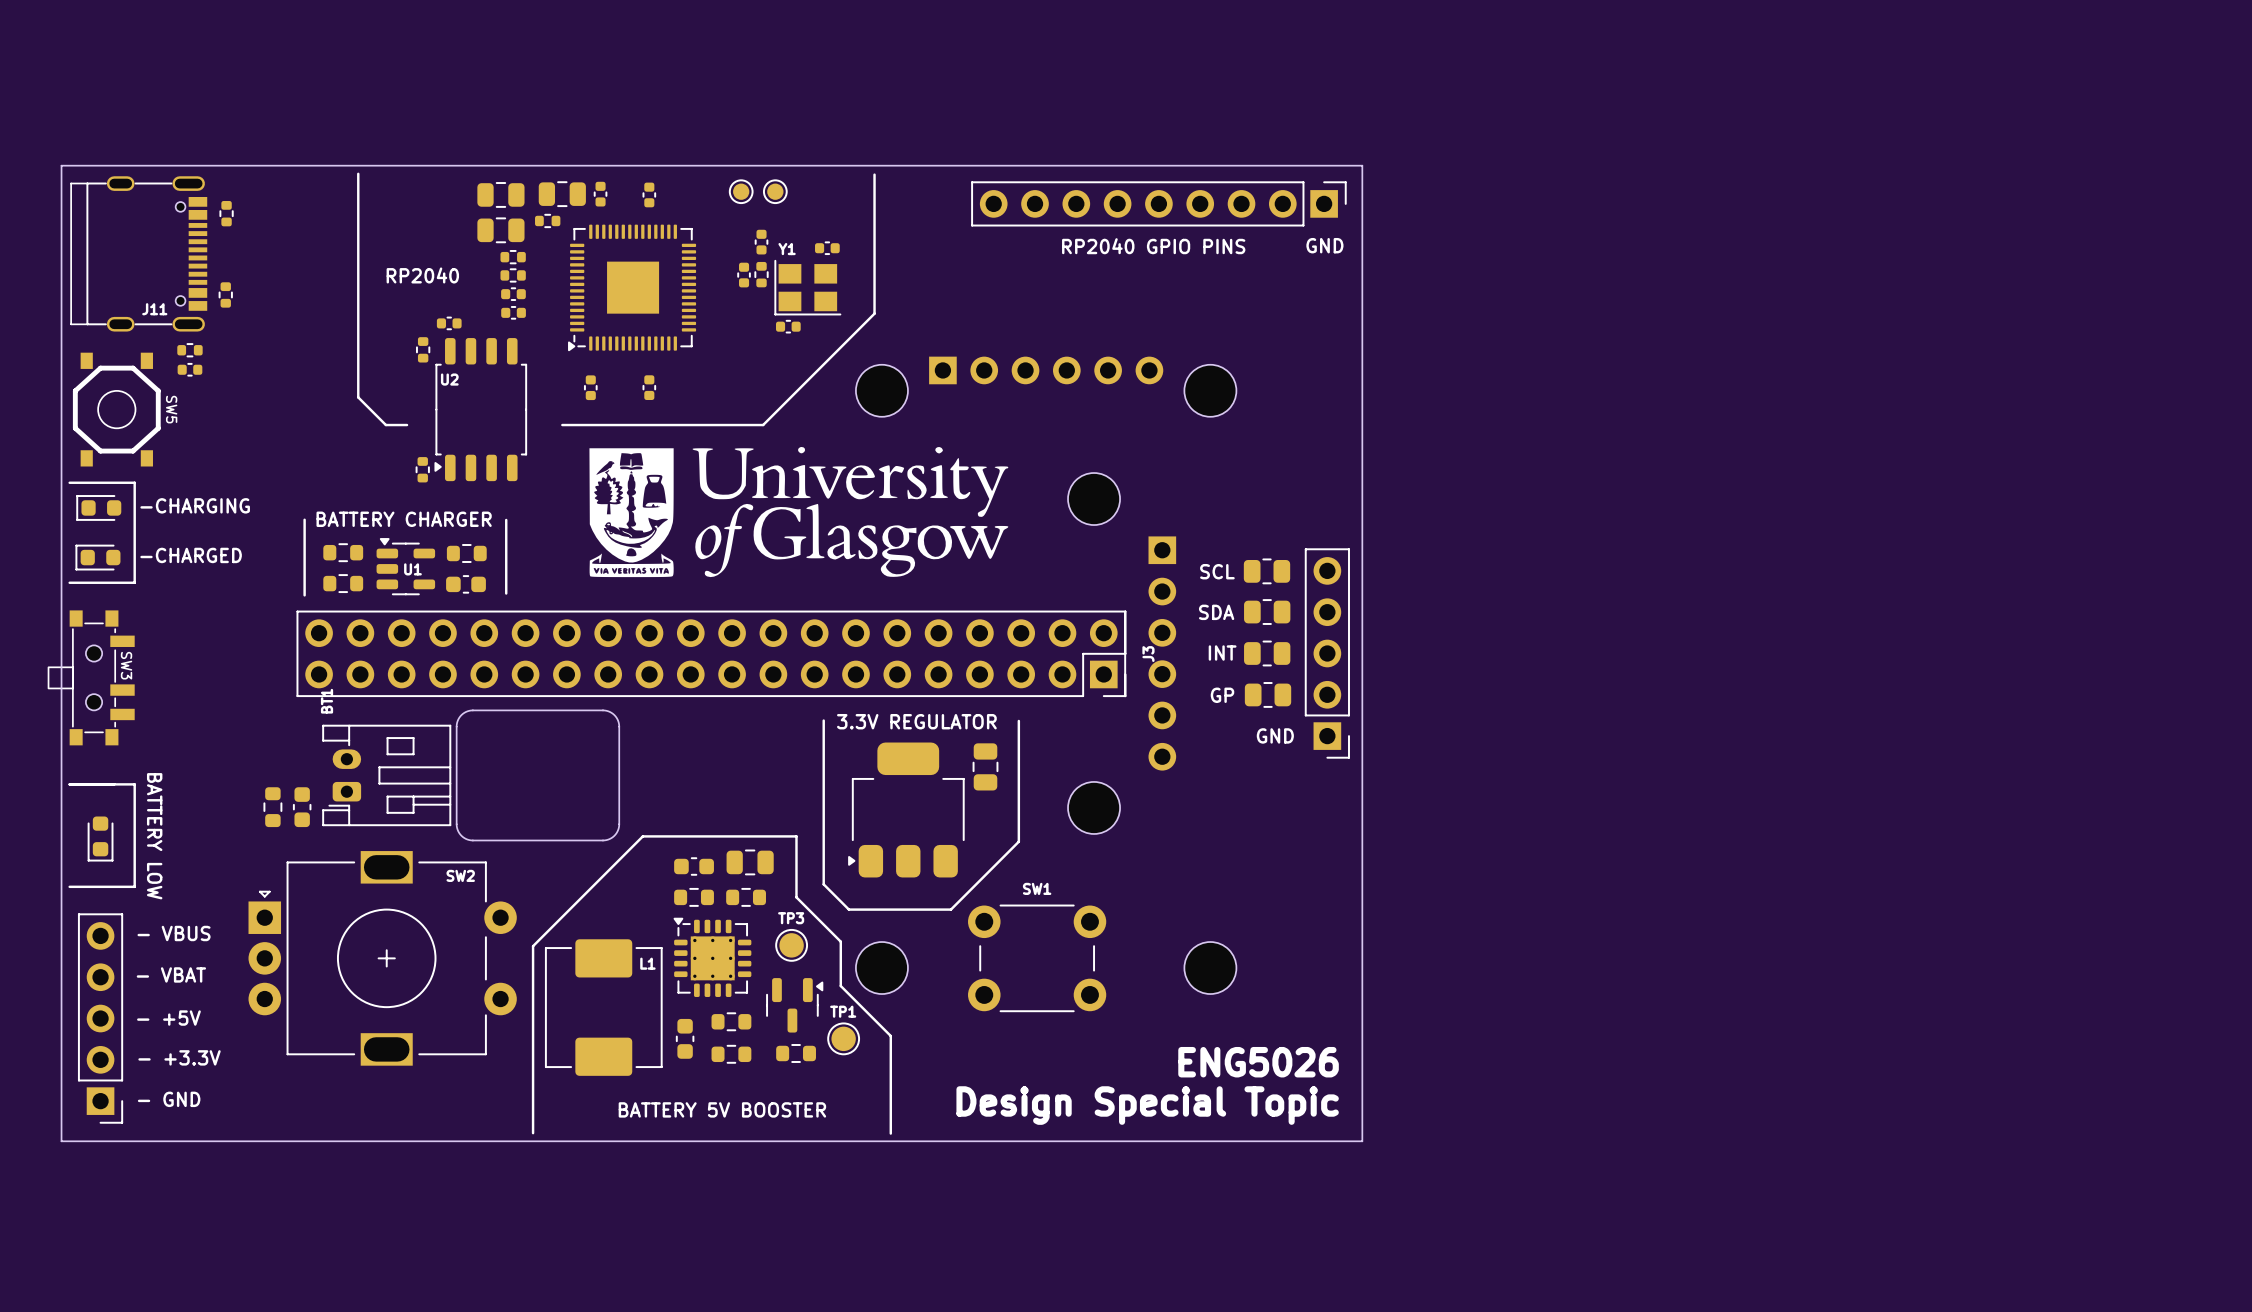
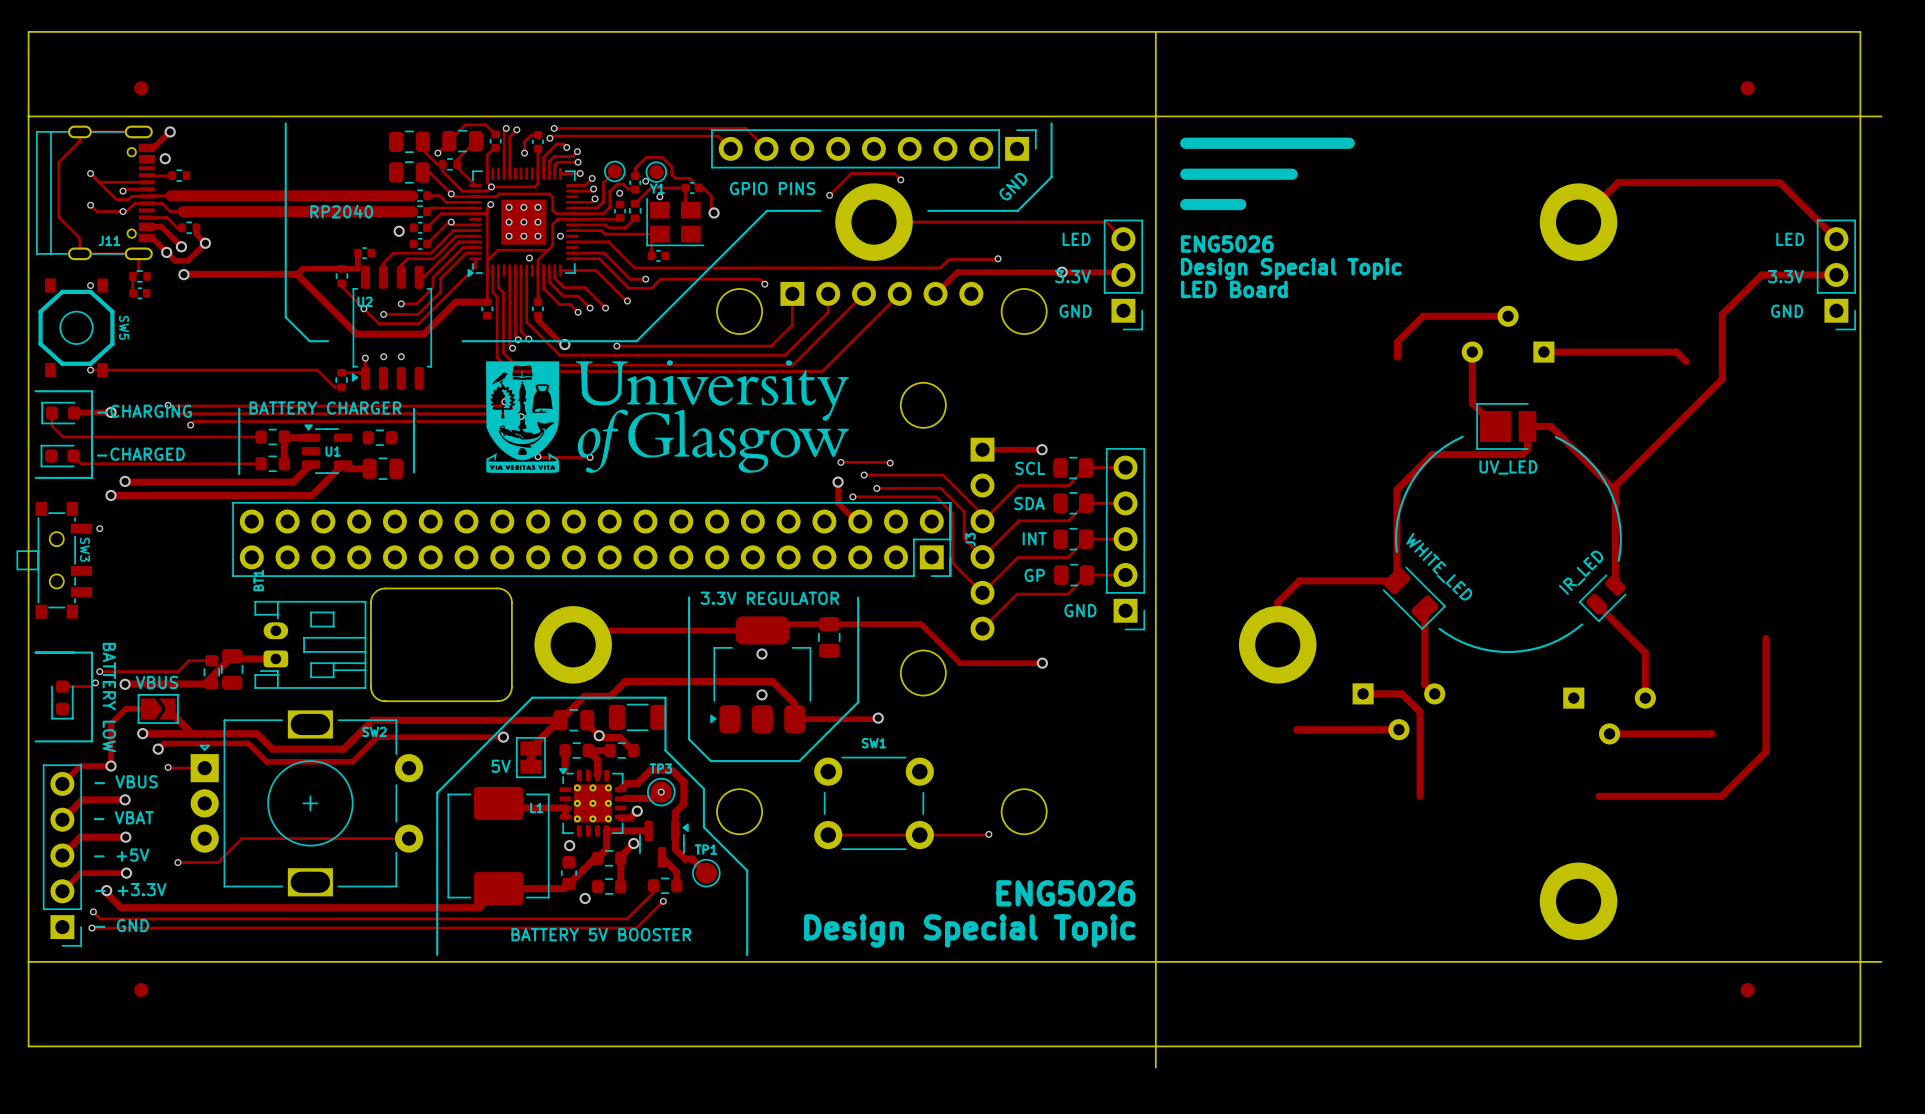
board edge: none -> (1155, 31) (1155, 116) (1881, 116)
part: none -> (141, 88)
part: none -> (1747, 88)
board edge: none -> (28, 116) (28, 31) (1860, 31) (1860, 1046) (28, 1046) (28, 961)
line: none -> (1051, 123) (1051, 177) (1017, 210) (928, 210)
line: (874, 174) (874, 313) -> (820, 210) (766, 210) (733, 244)
track: none -> (506, 128) (504, 130) (504, 173)
via: none -> (506, 128)
track: none -> (554, 128) (746, 128) (766, 148)
via: none -> (554, 128)
track: none -> (516, 129) (509, 136) (509, 173)
via: none -> (516, 129)
track: none -> (138, 131) (79, 131) (79, 141) (58, 162) (58, 217) (79, 238) (79, 253) (138, 253) (138, 270) (132, 276) (133, 293)
track: none -> (170, 131) (153, 147) (146, 147)
via: none -> (170, 131)
track: none -> (494, 134) (485, 124) (465, 124) (437, 153)
track: none -> (537, 135) (531, 135) (524, 141) (524, 153)
track: none -> (549, 138) (552, 136) (718, 136) (730, 148)
via: none -> (549, 138)
part: (741, 191) -> none
part: (775, 191) -> none
track: none -> (422, 141) (422, 149) (437, 164) (442, 164) (442, 171) (462, 191) (487, 191) (491, 186)
track: none -> (475, 141) (457, 159) (457, 167) (475, 185)
line: none -> (1185, 143) (1349, 143)
track: none -> (494, 147) (487, 154) (487, 182) (491, 186)
track: none -> (566, 147) (563, 143) (556, 143) (543, 157) (543, 173)
via: none -> (566, 147)
track: none -> (537, 148) (537, 184) (535, 186) (491, 186)
part position: (1158, 203) -> (873, 148)
track: none -> (577, 151) (572, 156) (554, 156) (549, 161) (549, 173)
via: none -> (577, 151)
via: none -> (437, 153)
via: none -> (524, 153)
part rotation: 0° (226, 213) -> 90° clockwise (179, 175)
part position: (226, 213) -> (179, 175)
via: none -> (165, 158)
track: none -> (578, 162) (557, 162) (554, 165) (554, 173)
via: none -> (578, 162)
track: none -> (614, 171) (603, 182) (603, 201) (597, 208) (572, 208)
part: none -> (614, 171)
part: none -> (656, 172)
track: none -> (422, 172) (429, 172) (454, 196) (549, 193) (552, 197) (552, 210) (556, 213) (603, 213) (609, 207) (609, 191) (617, 184) (623, 184) (628, 189) (635, 189)
track: none -> (90, 173) (116, 199) (128, 199) (131, 196) (170, 196)
via: none -> (90, 173)
track: none -> (560, 173) (580, 173)
via: none -> (580, 173)
line: none -> (1185, 174) (1292, 174)
track: none -> (146, 175) (171, 175)
track: none -> (635, 175) (635, 168) (646, 157) (661, 157) (671, 167) (671, 174) (676, 178) (689, 178) (711, 196) (711, 210) (714, 212)
track: none -> (592, 178) (585, 185) (572, 185)
via: none -> (592, 178)
track: none -> (900, 179) (894, 173) (851, 173) (829, 195)
via: none -> (900, 179)
via: none -> (645, 181)
track: none -> (99, 182) (146, 182)
text: GND (1324, 245) -> none
via: none -> (491, 186)
text: RP2040 GPIO PINS (1153, 246) -> none
text: none -> GND (1013, 186)
text: none -> GPIO PINS (772, 188)
track: none -> (146, 189) (124, 189) (122, 191)
track: none -> (593, 189) (591, 191) (572, 191)
via: none -> (593, 189)
via: none -> (122, 191)
via: none -> (619, 193)
via: none -> (451, 193)
via: none -> (829, 195)
track: none -> (170, 195) (412, 195)
track: none -> (427, 195) (439, 195) (446, 202) (475, 202)
via: none -> (659, 196)
track: none -> (595, 198) (591, 202) (572, 202)
via: none -> (595, 198)
track: none -> (635, 203) (650, 187) (685, 187) (685, 204) (690, 210)
track: none -> (490, 204) (487, 208) (487, 302) (455, 302) (423, 334) (356, 334) (297, 274)
via: none -> (490, 204)
line: none -> (1185, 204) (1240, 204)
track: none -> (90, 205) (96, 211) (126, 211) (134, 203) (162, 203) (170, 211) (412, 211)
via: none -> (90, 205)
via: none -> (509, 207)
via: none -> (523, 207)
via: none -> (537, 207)
track: none -> (475, 208) (430, 208) (427, 211)
via: none -> (122, 211)
track: none -> (487, 211) (485, 213) (441, 213) (426, 227)
via: none -> (714, 212)
track: none -> (146, 217) (167, 217) (177, 227) (182, 227)
track: none -> (620, 217) (557, 219) (552, 224) (552, 245) (537, 260) (537, 302)
track: none -> (635, 218) (625, 227) (608, 227) (605, 224) (572, 224)
via: none -> (451, 222)
via: none -> (509, 222)
via: none -> (523, 222)
via: none -> (537, 222)
track: none -> (874, 222) (1106, 222) (1123, 239)
part: none -> (874, 222)
track: none -> (1578, 222) (1618, 182) (1779, 182) (1836, 239)
part: none -> (1578, 222)
track: none -> (475, 224) (454, 224) (448, 222) (427, 243)
track: none -> (146, 226) (161, 226) (181, 246)
part rotation: 0° (225, 294) -> 90° clockwise (189, 227)
part position: (225, 294) -> (189, 227)
track: none -> (196, 227) (196, 234) (205, 243) (187, 260) (175, 260) (152, 237) (146, 237)
track: none -> (475, 230) (453, 230) (431, 253) (393, 253) (383, 263) (383, 277)
track: none -> (572, 230) (601, 230) (604, 234) (659, 234) (651, 242) (651, 255)
via: none -> (399, 231)
track: none -> (475, 236) (456, 236) (433, 258) (407, 258) (401, 265) (401, 277)
via: none -> (509, 236)
via: none -> (523, 236)
via: none -> (537, 236)
via: none -> (560, 236)
text: none -> LED (1076, 239)
text: none -> LED (1790, 239)
track: none -> (475, 241) (459, 241) (423, 277) (419, 277)
track: none -> (572, 241) (608, 241) (634, 267) (940, 267) (948, 259) (998, 258)
via: none -> (205, 243)
text: none -> ENG5026 (1227, 244)
via: none -> (181, 246)
track: none -> (475, 247) (463, 247) (432, 277) (432, 287) (416, 303) (401, 303)
track: none -> (547, 250) (497, 250) (487, 260)
via: none -> (166, 252)
track: none -> (357, 253) (357, 268) (302, 268) (297, 274)
track: none -> (475, 253) (466, 253) (440, 278) (440, 291) (418, 314) (383, 314)
track: none -> (572, 253) (604, 253) (630, 279) (645, 279)
track: none -> (475, 258) (475, 267) (418, 323) (378, 323) (341, 286) (341, 283)
via: none -> (529, 258)
track: none -> (572, 258) (599, 258) (628, 288) (651, 288) (660, 279) (759, 279) (764, 284)
via: none -> (998, 258)
text: none -> Design Special Topic (1291, 269)
track: none -> (492, 270) (492, 292) (497, 296) (497, 357) (511, 371) (822, 371) (899, 293)
track: none -> (498, 270) (498, 287) (503, 292) (503, 353) (515, 365) (792, 365) (863, 293)
track: none -> (509, 270) (509, 345) (512, 348)
track: none -> (515, 270) (515, 336) (518, 339)
track: none -> (521, 270) (521, 331) (528, 339)
track: none -> (526, 270) (526, 322) (559, 355) (785, 355) (828, 312) (828, 293)
track: none -> (543, 270) (543, 288) (559, 304) (570, 304) (578, 312)
track: none -> (549, 270) (549, 282) (563, 296) (578, 296) (590, 308)
track: none -> (554, 270) (554, 278) (564, 287) (585, 287) (605, 308)
track: none -> (560, 270) (596, 270) (627, 301)
via: none -> (1062, 272)
track: none -> (297, 274) (183, 274)
via: none -> (183, 274)
track: none -> (1123, 274) (1120, 272) (957, 272) (935, 293)
part: none -> (1123, 274)
track: none -> (1836, 274) (1761, 274) (1722, 314) (1722, 379) (1615, 486) (1615, 585)
part: none -> (1836, 274)
text: none -> 3.3V (1072, 276)
text: none -> 3.3V (1785, 276)
via: none -> (645, 279)
via: none -> (764, 284)
via: none -> (90, 285)
text: none -> LED Board (1234, 289)
track: none -> (792, 293) (792, 324) (771, 346) (616, 346)
via: none -> (627, 301)
via: none -> (401, 303)
via: none -> (590, 308)
via: none -> (605, 308)
via: none -> (363, 308)
text: none -> GND (1075, 311)
text: none -> GND (1787, 311)
via: none -> (578, 312)
via: none -> (383, 314)
track: none -> (537, 315) (537, 320) (562, 344) (564, 344)
track: none -> (1508, 316) (1423, 316) (1397, 341) (1397, 357)
part: none -> (1508, 334)
via: none -> (528, 339)
via: none -> (518, 339)
via: none -> (564, 344)
via: none -> (616, 346)
via: none -> (512, 348)
track: none -> (1472, 352) (1472, 403) (1495, 426)
track: none -> (1543, 352) (1676, 352) (1686, 361)
via: none -> (383, 356)
via: none -> (401, 356)
track: none -> (365, 358) (365, 378) (359, 372) (341, 372)
via: none -> (365, 358)
track: none -> (90, 370) (317, 370) (334, 387) (341, 387)
via: none -> (90, 370)
track: none -> (504, 401) (500, 406) (168, 405)
via: none -> (504, 401)
via: none -> (168, 405)
track: none -> (513, 408) (508, 413) (177, 415)
track: none -> (52, 413) (52, 425) (63, 437) (261, 437)
track: none -> (111, 412) (74, 413)
via: none -> (111, 412)
track: none -> (521, 416) (516, 421) (194, 421) (190, 425)
via: none -> (521, 416)
text position: BATTERY CHARGER (404, 519) -> BATTERY CHARGER (325, 408)
via: none -> (190, 425)
part: none -> (1506, 426)
part: none -> (272, 437)
line: none -> (1462, 436) (1437, 452) (1422, 466) (1410, 483) (1399, 511) (1396, 531) (1396, 551)
line: none -> (1555, 437) (1572, 446) (1586, 458) (1598, 472) (1608, 488) (1615, 505) (1619, 523) (1620, 542) (1618, 561)
track: none -> (310, 437) (284, 437) (284, 463)
track: none -> (982, 449) (1042, 450)
via: none -> (1042, 449)
part: (343, 552) -> none
part position: (466, 553) -> (379, 437)
track: none -> (73, 456) (81, 463) (261, 463)
track: none -> (537, 456) (590, 457)
via: none -> (537, 456)
via: none -> (590, 457)
track: none -> (840, 462) (890, 463)
via: none -> (840, 462)
via: none -> (890, 463)
part: none -> (272, 463)
U1 position: (405, 566) -> (326, 449)
track: none -> (310, 464) (293, 482) (125, 481)
track: none -> (368, 464) (363, 468) (347, 468) (342, 464) (311, 495) (111, 495)
track: none -> (1125, 467) (1086, 467) (1068, 485) (1018, 485) (982, 521) (982, 514) (943, 475) (864, 475)
text: none -> UV_LED (1508, 467)
part: none -> (382, 468)
line: (506, 576) (506, 593) -> (413, 408) (413, 423)
line: (304, 578) (304, 595) -> (239, 408) (239, 423)
via: none -> (864, 475)
part: (343, 583) -> none
part: (465, 584) -> none
via: none -> (125, 481)
track: none -> (838, 482) (838, 503) (856, 521) (860, 521)
via: none -> (838, 482)
track: none -> (876, 488) (940, 488) (964, 511) (964, 538) (982, 557) (1018, 520) (1068, 520) (1086, 503) (1125, 503)
via: none -> (876, 488)
track: none -> (1615, 490) (1551, 426) (1527, 426) (1527, 448) (1521, 454) (1432, 454) (1396, 489) (1396, 580) (1299, 580) (1277, 602) (1277, 644)
via: none -> (111, 495)
track: none -> (852, 496) (936, 496) (952, 513) (952, 563) (982, 592) (1017, 557) (1067, 557) (1086, 539) (1125, 539)
via: none -> (852, 496)
via: none -> (99, 528)
text: none -> WHITE_LED (1439, 566)
text: none -> IR_LED (1581, 572)
track: none -> (1125, 575) (1086, 575) (1067, 594) (1017, 594) (982, 628)
part: none -> (1414, 598)
part: none -> (1602, 598)
track: none -> (1596, 604) (1645, 652) (1645, 698)
track: none -> (1424, 608) (1424, 684) (1434, 693)
line: none -> (1582, 624) (1566, 635) (1549, 644) (1530, 649) (1511, 651) (1492, 650) (1473, 646) (1455, 639) (1439, 628)
track: none -> (1765, 638) (1765, 751) (1721, 796) (1598, 796)
track: none -> (573, 644) (587, 630) (762, 630) (768, 624) (920, 624) (959, 663) (1042, 663)
part: none -> (573, 644)
part: none -> (1277, 644)
via: none -> (762, 654)
part footprint: [292, 787, 312, 828] -> [220, 649, 244, 690]
track: none -> (204, 660) (188, 660) (177, 671) (99, 671)
track: none -> (273, 661) (275, 658) (235, 658) (232, 656) (204, 683) (125, 684)
via: none -> (1042, 663)
via: none -> (99, 671)
text: none -> VBUS (156, 682)
track: none -> (95, 682) (91, 686) (62, 686)
via: none -> (95, 682)
via: none -> (125, 684)
track: none -> (1363, 693) (1402, 693) (1420, 711) (1420, 796)
via: none -> (762, 694)
track: none -> (147, 708) (125, 708) (111, 723) (111, 766) (80, 766) (62, 783)
part: none -> (158, 708)
track: none -> (168, 708) (192, 733)
part footprint: [726, 849, 774, 876] -> [608, 703, 667, 732]
part: none -> (1398, 711)
part footprint: [674, 857, 714, 876] -> [553, 709, 595, 732]
part: none -> (1609, 716)
track: none -> (878, 718) (794, 719) (794, 703) (772, 681) (625, 681) (610, 696) (584, 696) (560, 720) (372, 720) (343, 749) (272, 749) (256, 733) (142, 733)
via: none -> (878, 718)
track: none -> (559, 720) (530, 748)
track: none -> (587, 720) (587, 723) (601, 737) (620, 737) (633, 750)
track: none -> (1398, 729) (1296, 730)
via: none -> (142, 733)
track: none -> (1711, 733) (1609, 733)
via: none -> (599, 735)
track: none -> (503, 737) (377, 737) (352, 761) (266, 761) (248, 743) (163, 743) (158, 749)
via: none -> (503, 737)
via: none -> (158, 749)
track: none -> (565, 749) (565, 770)
track: none -> (610, 750) (588, 750) (597, 759) (597, 775)
part: none -> (530, 757)
via: none -> (111, 766)
text: none -> 5V (501, 766)
track: none -> (168, 767) (204, 768)
via: none -> (168, 767)
track: none -> (620, 789) (625, 783) (637, 783) (650, 770) (671, 770) (683, 782) (683, 804) (675, 812) (675, 849) (685, 859) (692, 859) (706, 873)
track: none -> (661, 792) (654, 798) (625, 798)
via: none -> (661, 792)
track: none -> (125, 799) (82, 799) (62, 819)
via: none -> (125, 799)
track: none -> (498, 803) (503, 807) (565, 807) (565, 817)
track: none -> (637, 811) (630, 817) (620, 817)
via: none -> (637, 811)
track: none -> (606, 830) (648, 830)
track: none -> (606, 831) (606, 849) (564, 888) (498, 888) (479, 907) (120, 907) (106, 893) (106, 890)
track: none -> (988, 834) (828, 835)
via: none -> (988, 834)
track: none -> (125, 837) (80, 837) (62, 855)
via: none -> (125, 837)
track: none -> (409, 838) (242, 838) (218, 862) (177, 862)
track: none -> (633, 843) (620, 856) (620, 886)
via: none -> (633, 843)
via: none -> (569, 845)
track: none -> (661, 857) (676, 872) (676, 885)
via: none -> (177, 862)
track: none -> (126, 873) (80, 873) (62, 891)
via: none -> (126, 873)
track: none -> (653, 885) (653, 892) (627, 918) (100, 918) (93, 911)
via: none -> (106, 890)
via: none -> (585, 898)
track: none -> (663, 901) (636, 928) (91, 928)
via: none -> (663, 901)
part: none -> (1578, 901)
via: none -> (93, 911)
via: none -> (91, 928)
board edge: none -> (1881, 961) (1155, 961) (1155, 1067)
part: none -> (141, 990)
part: none -> (1747, 990)

